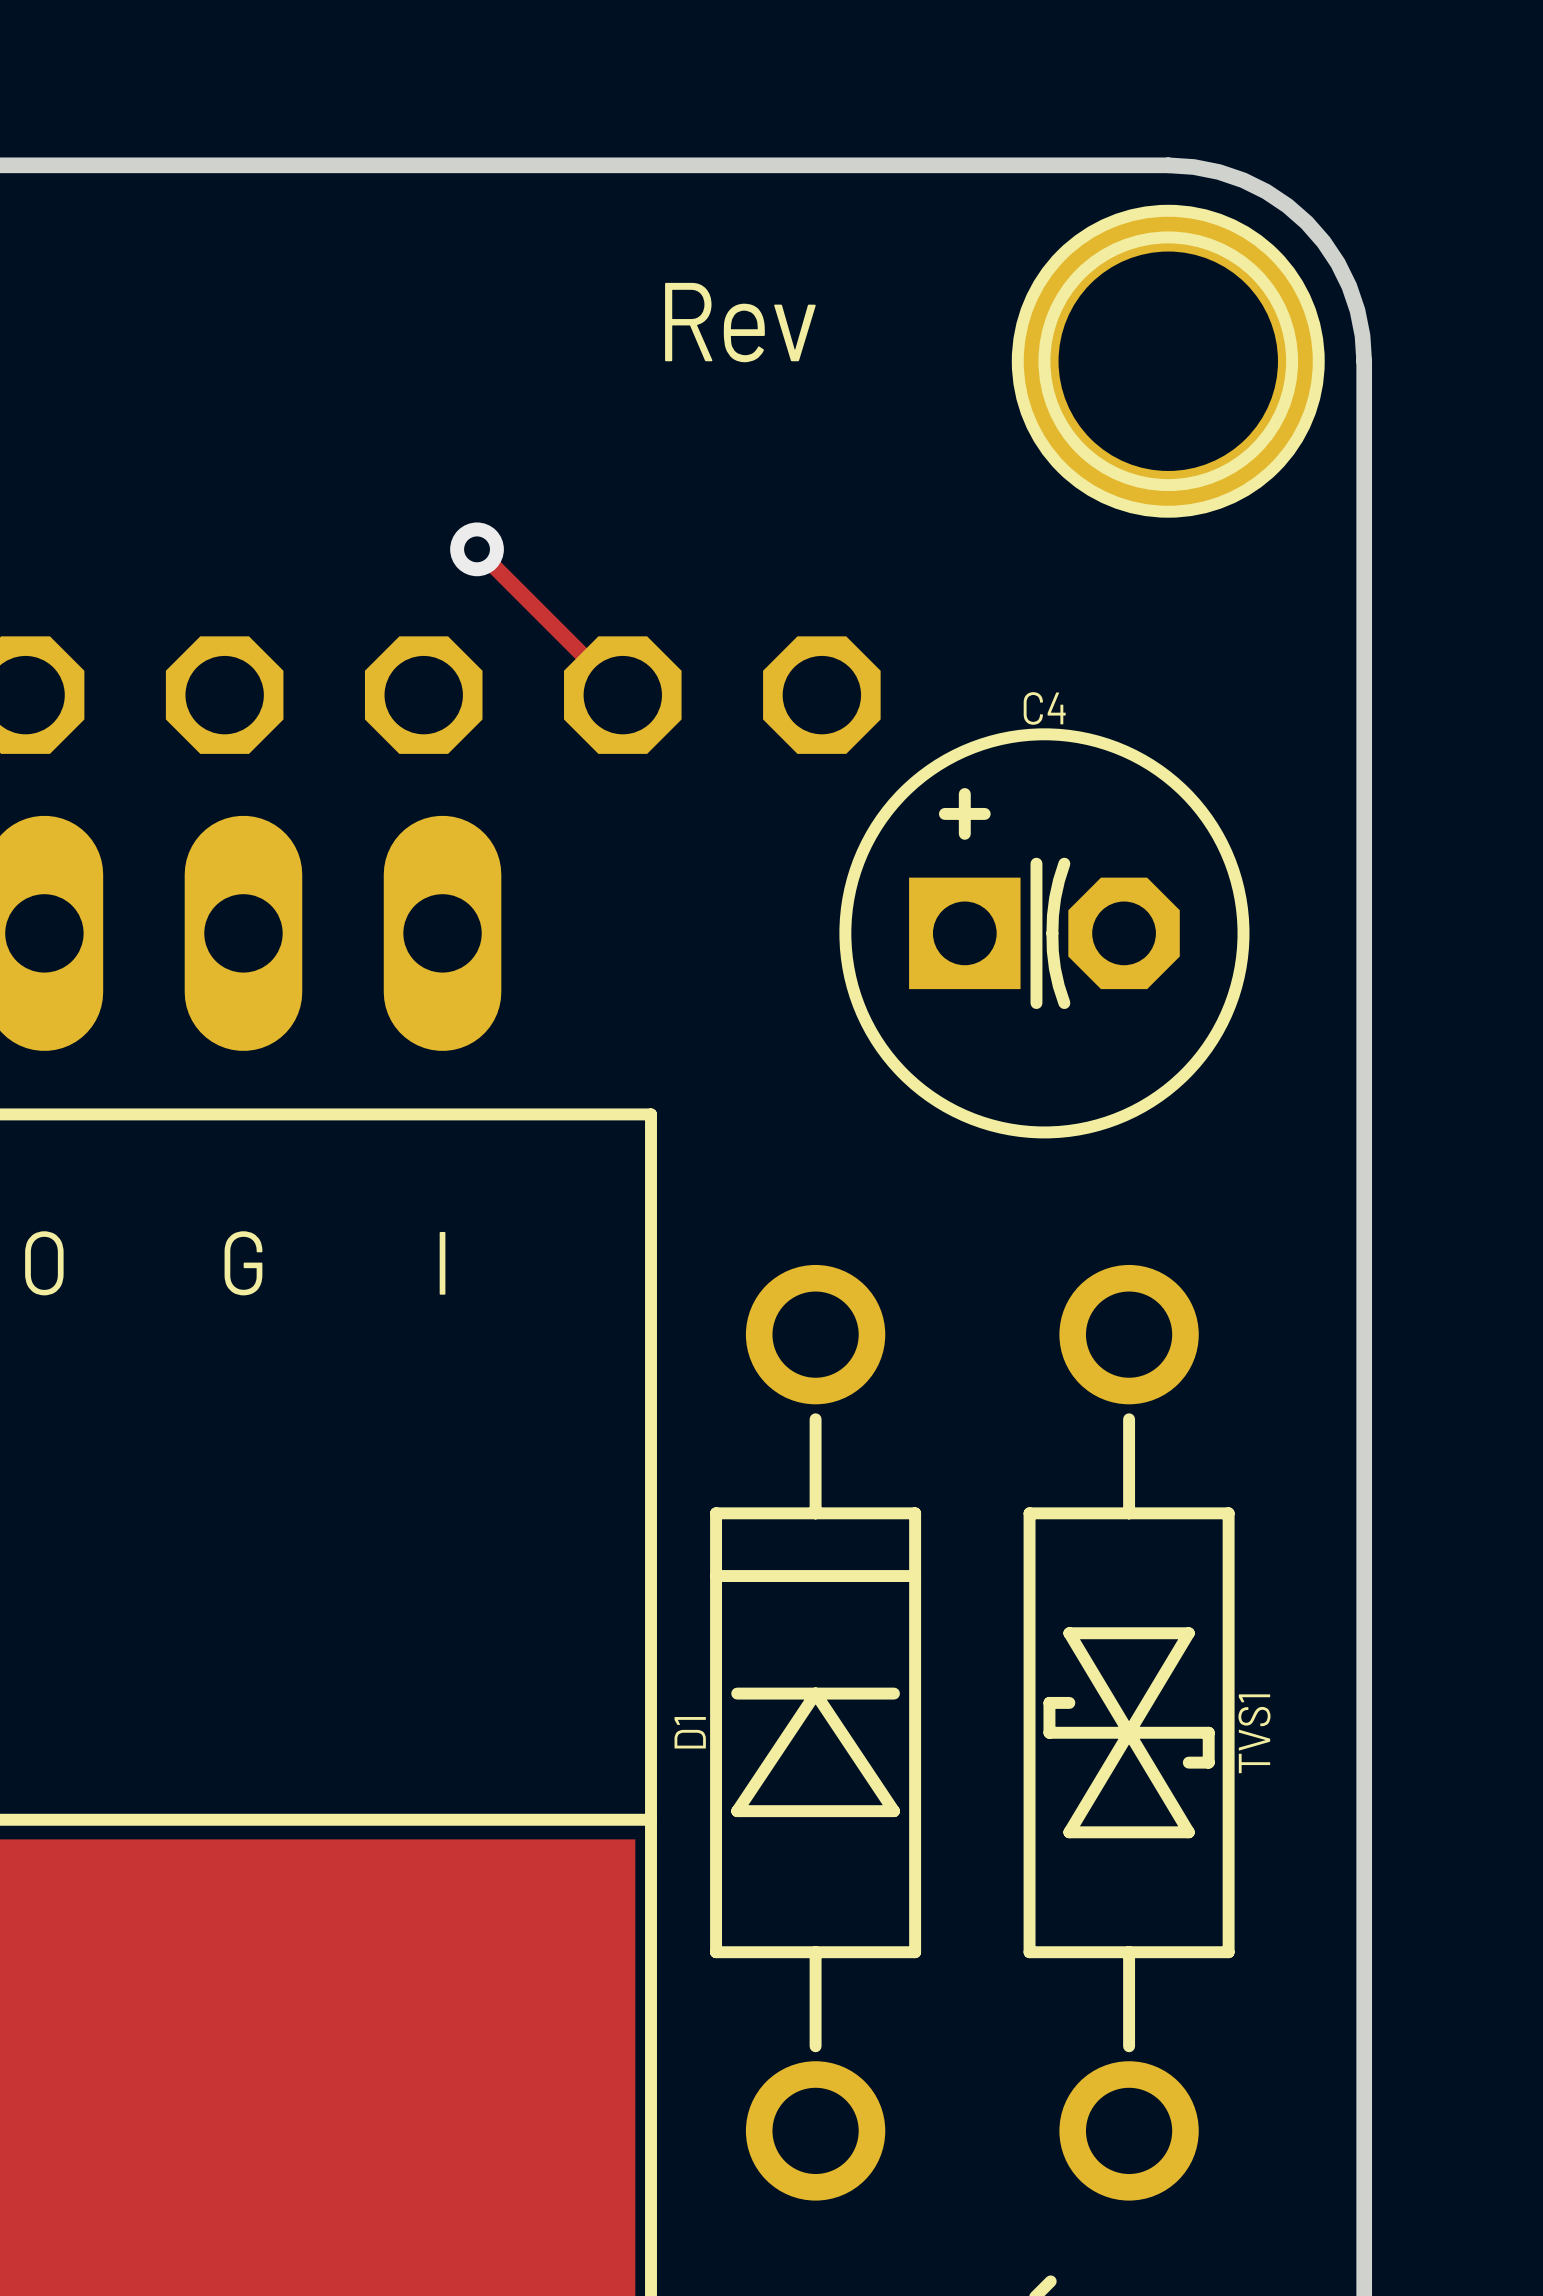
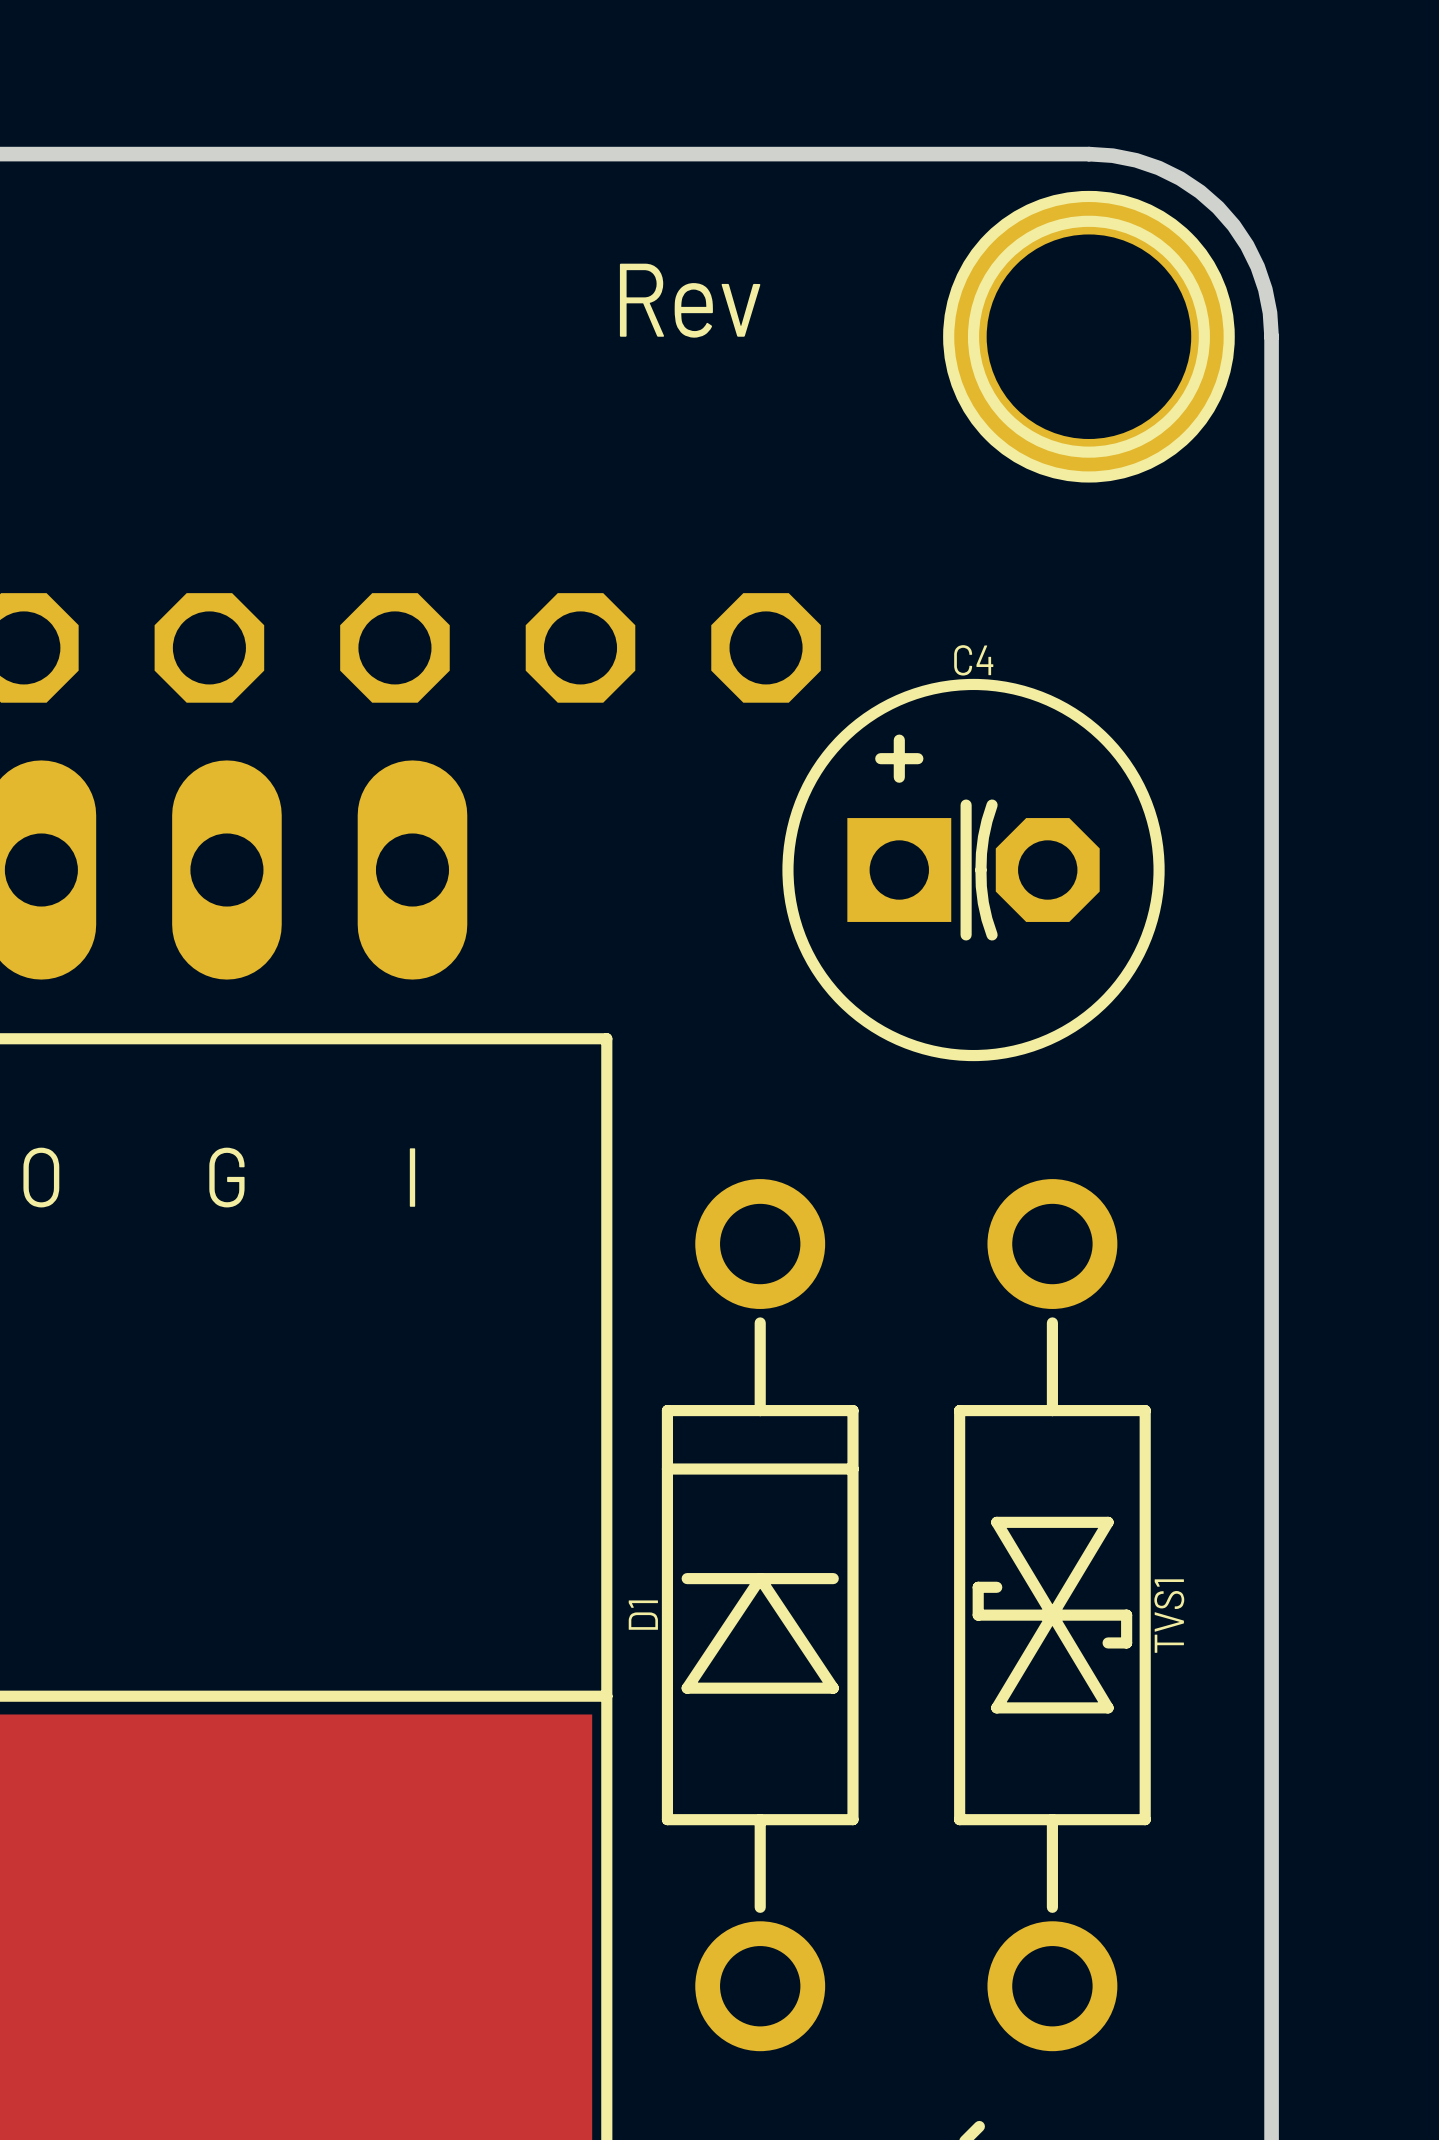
track: (477, 549) (622, 695) -> none
via: (477, 549) -> none

